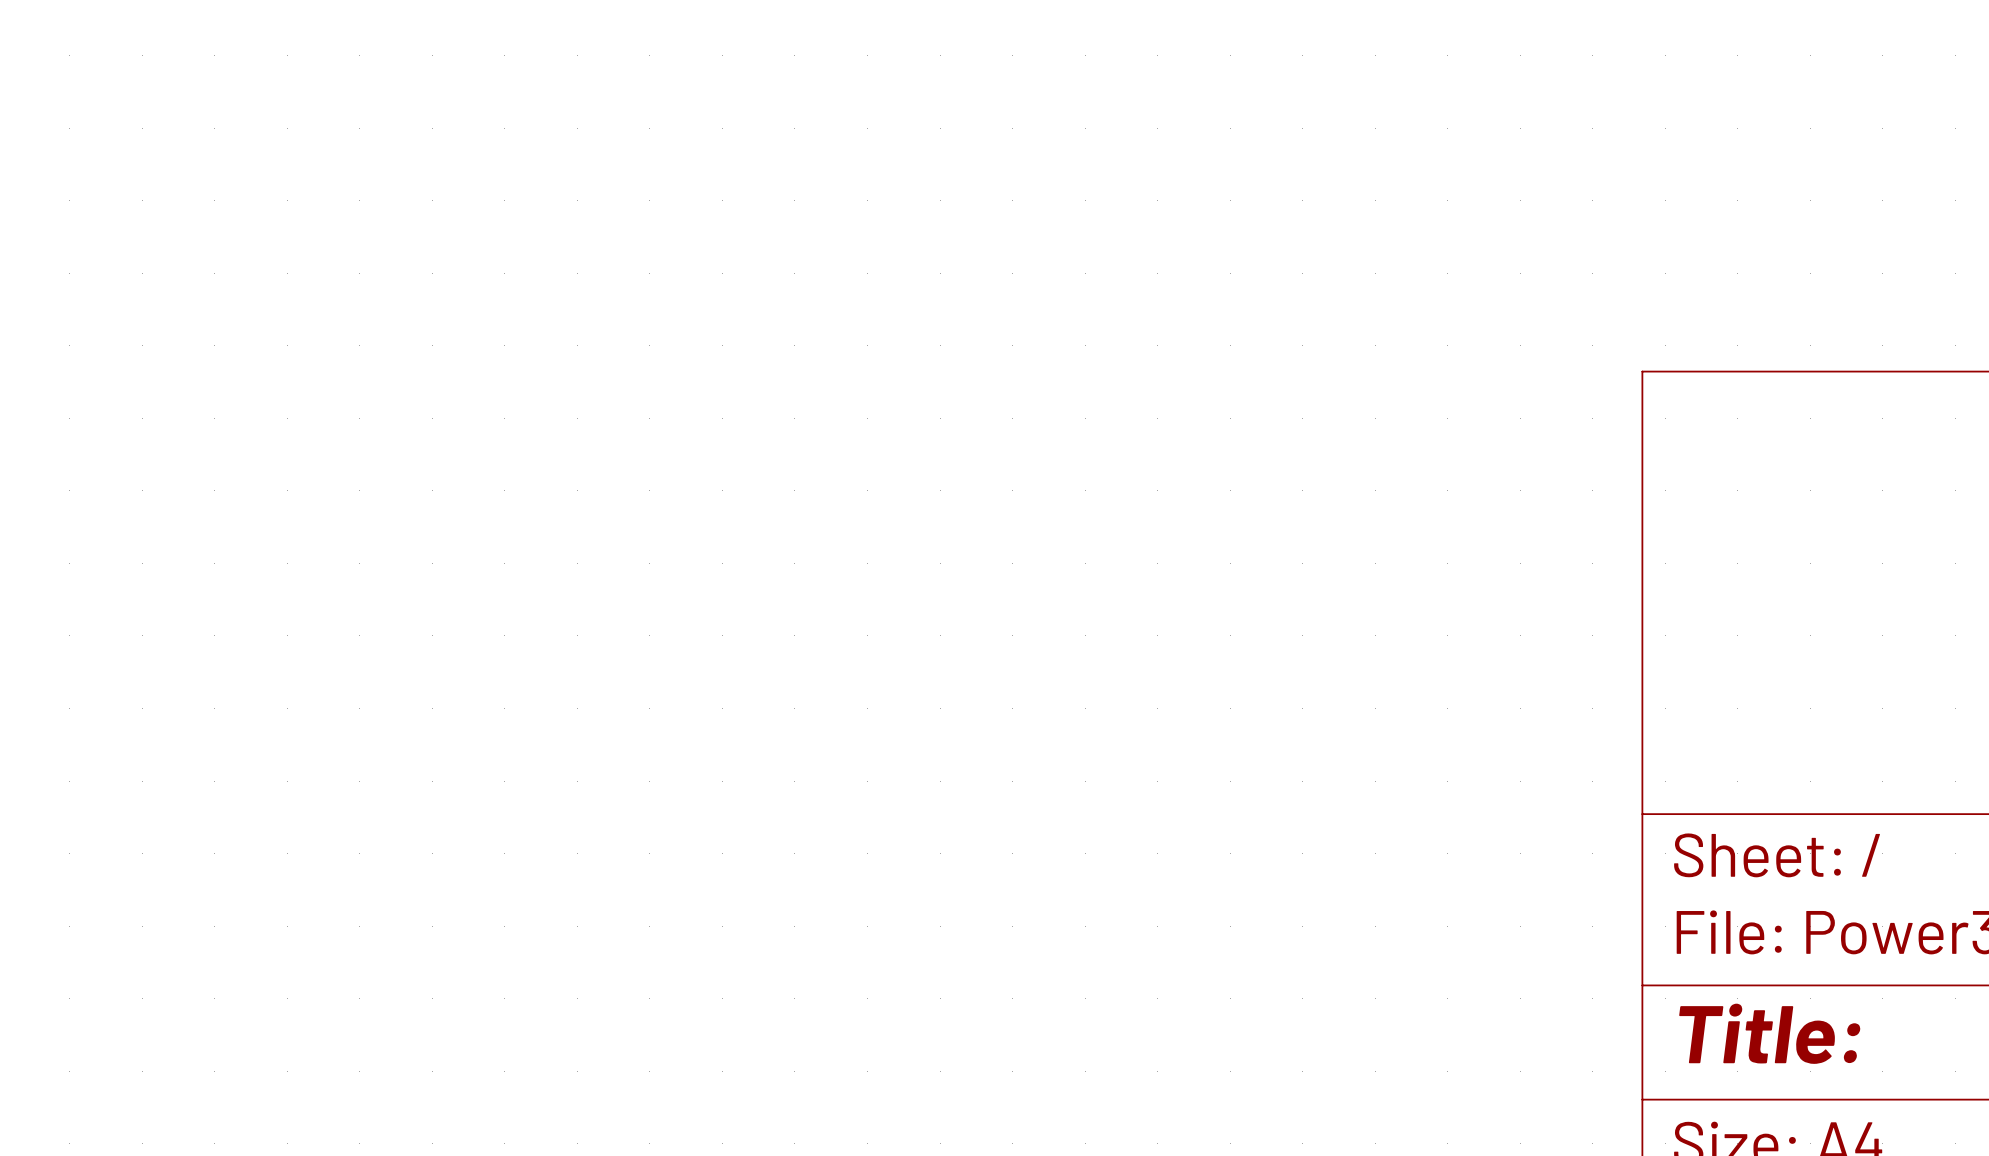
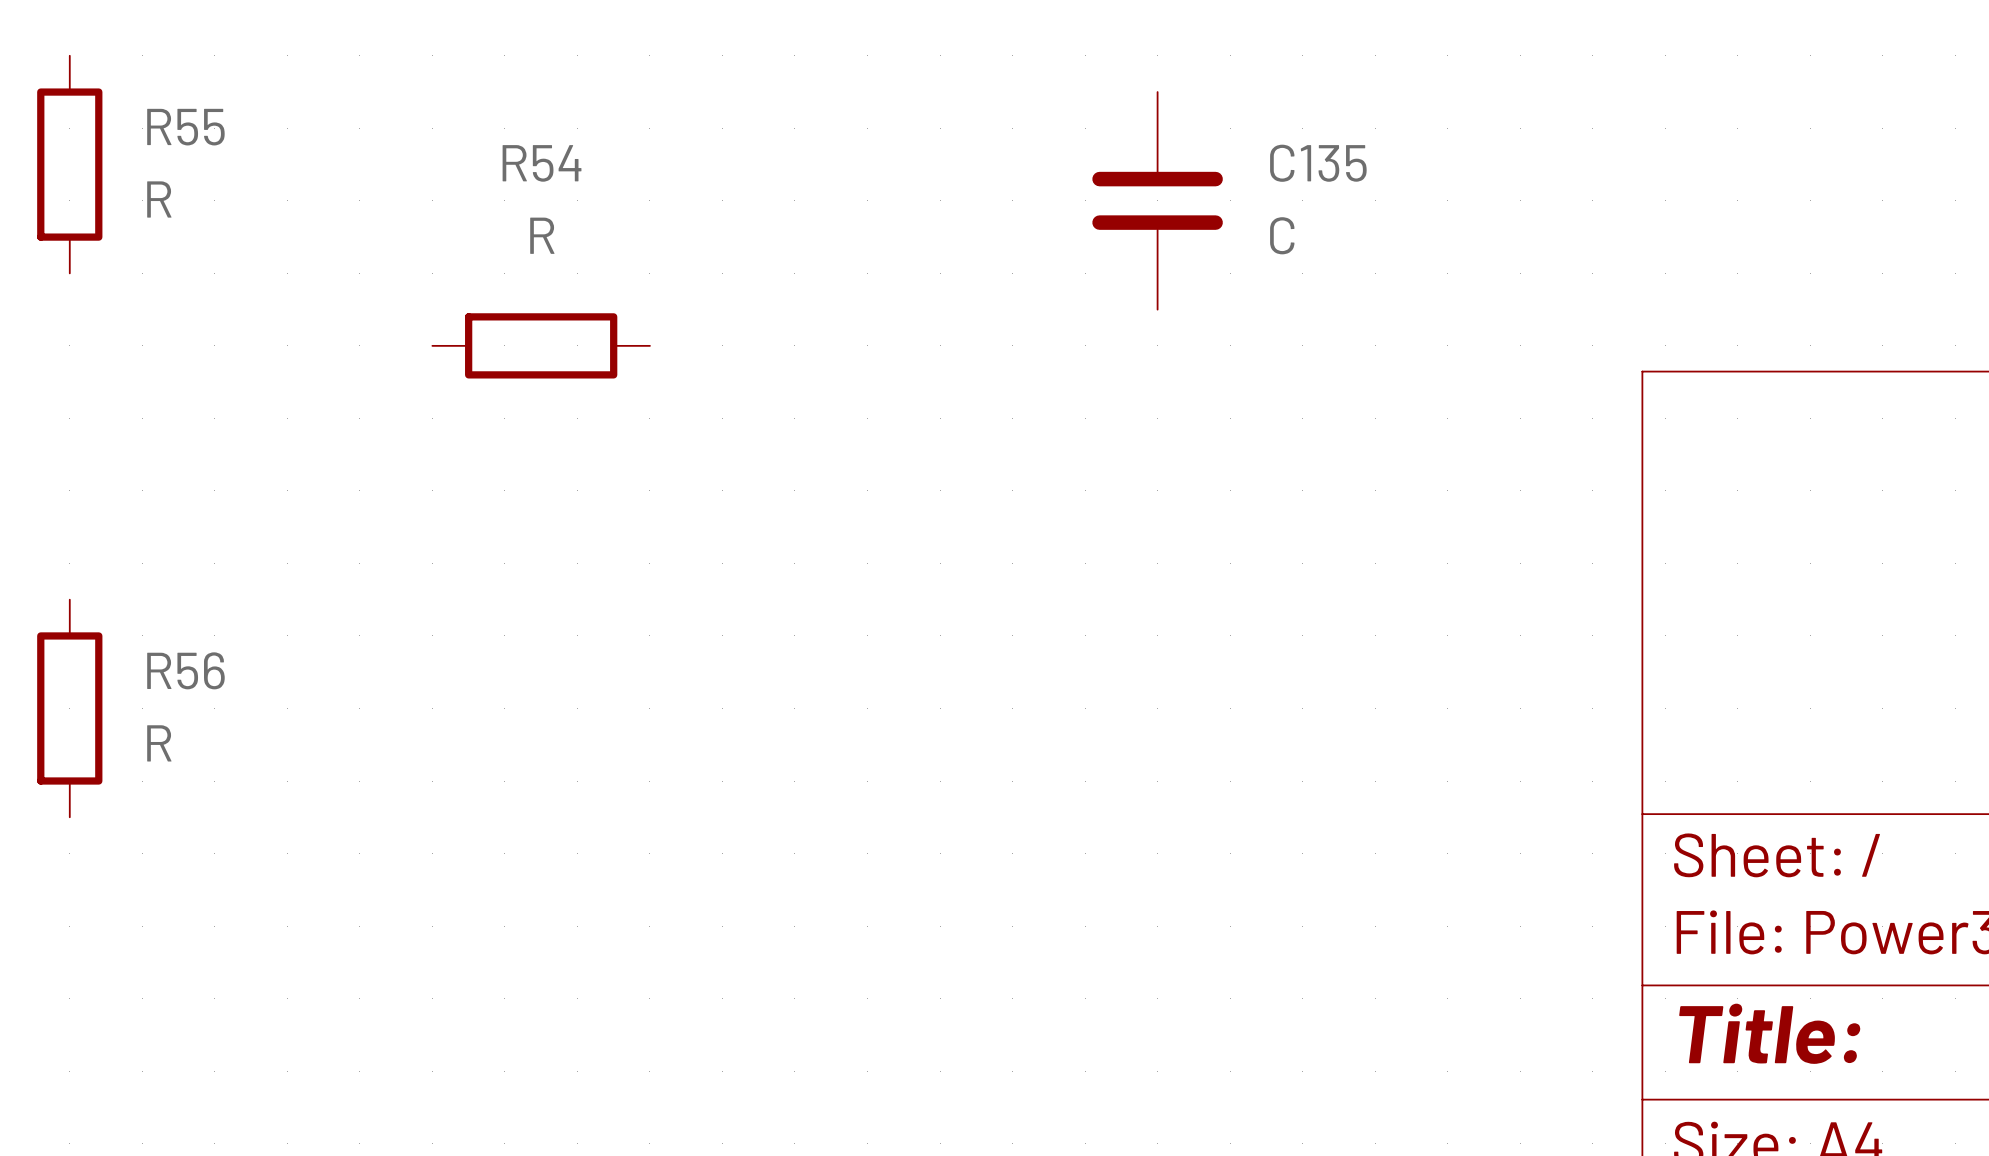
R55: none -> R (69, 164)
C135: none -> C (1157, 200)
R54: none -> R (541, 345)
R56: none -> R (69, 708)

